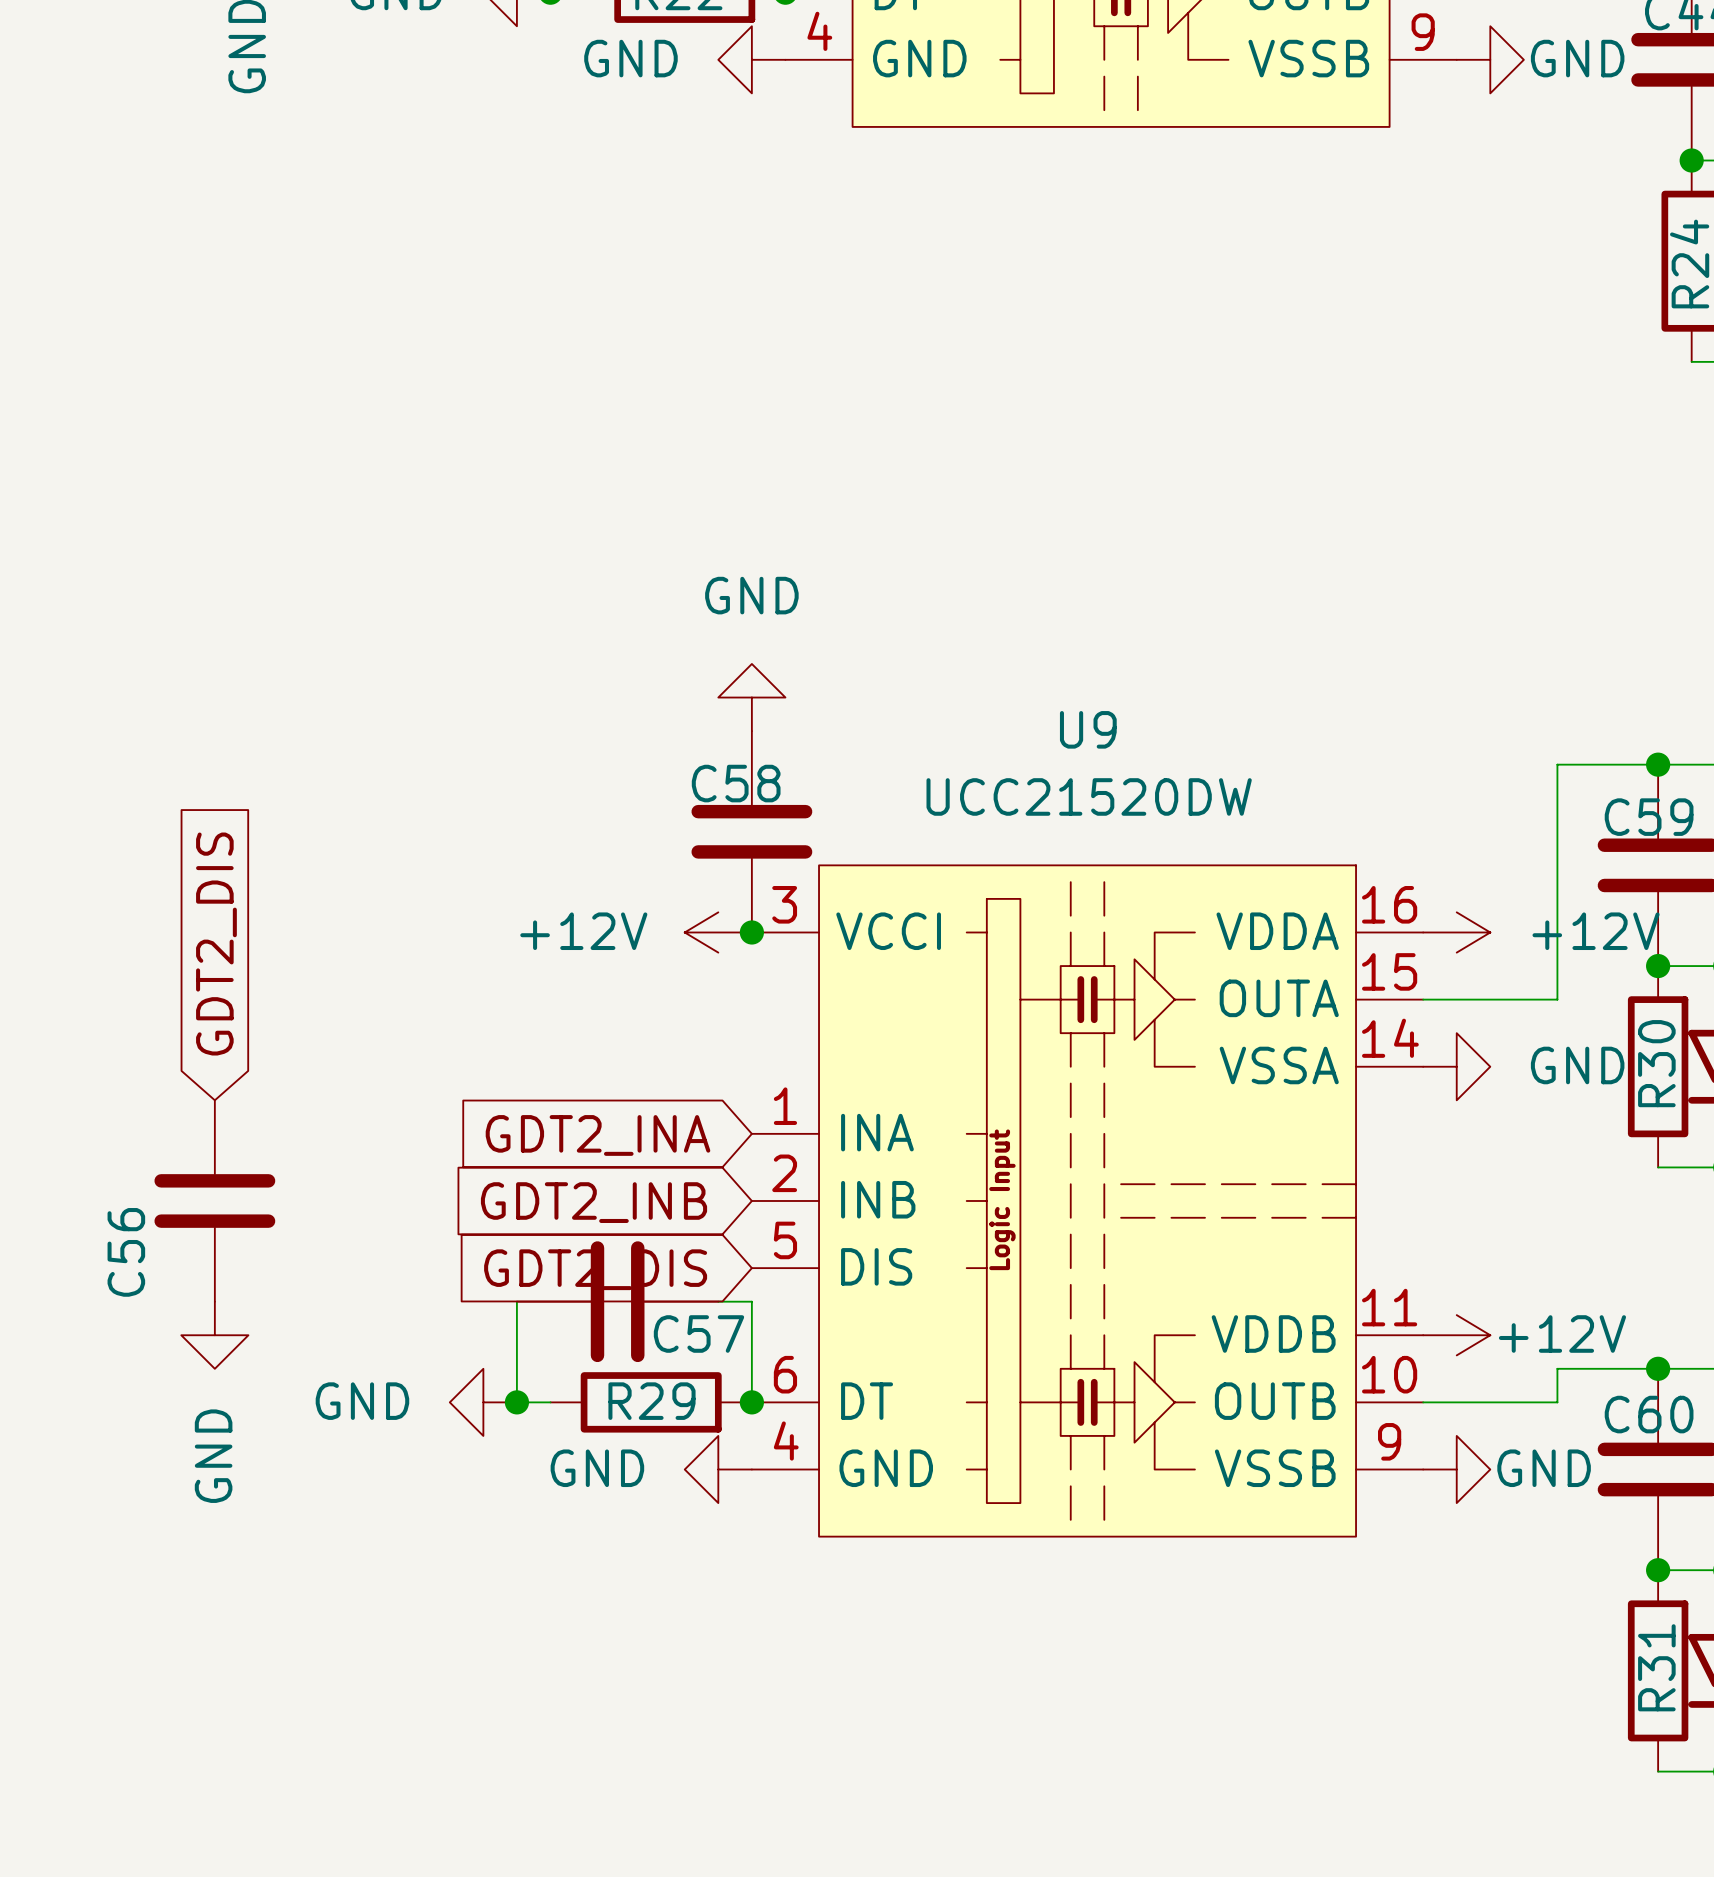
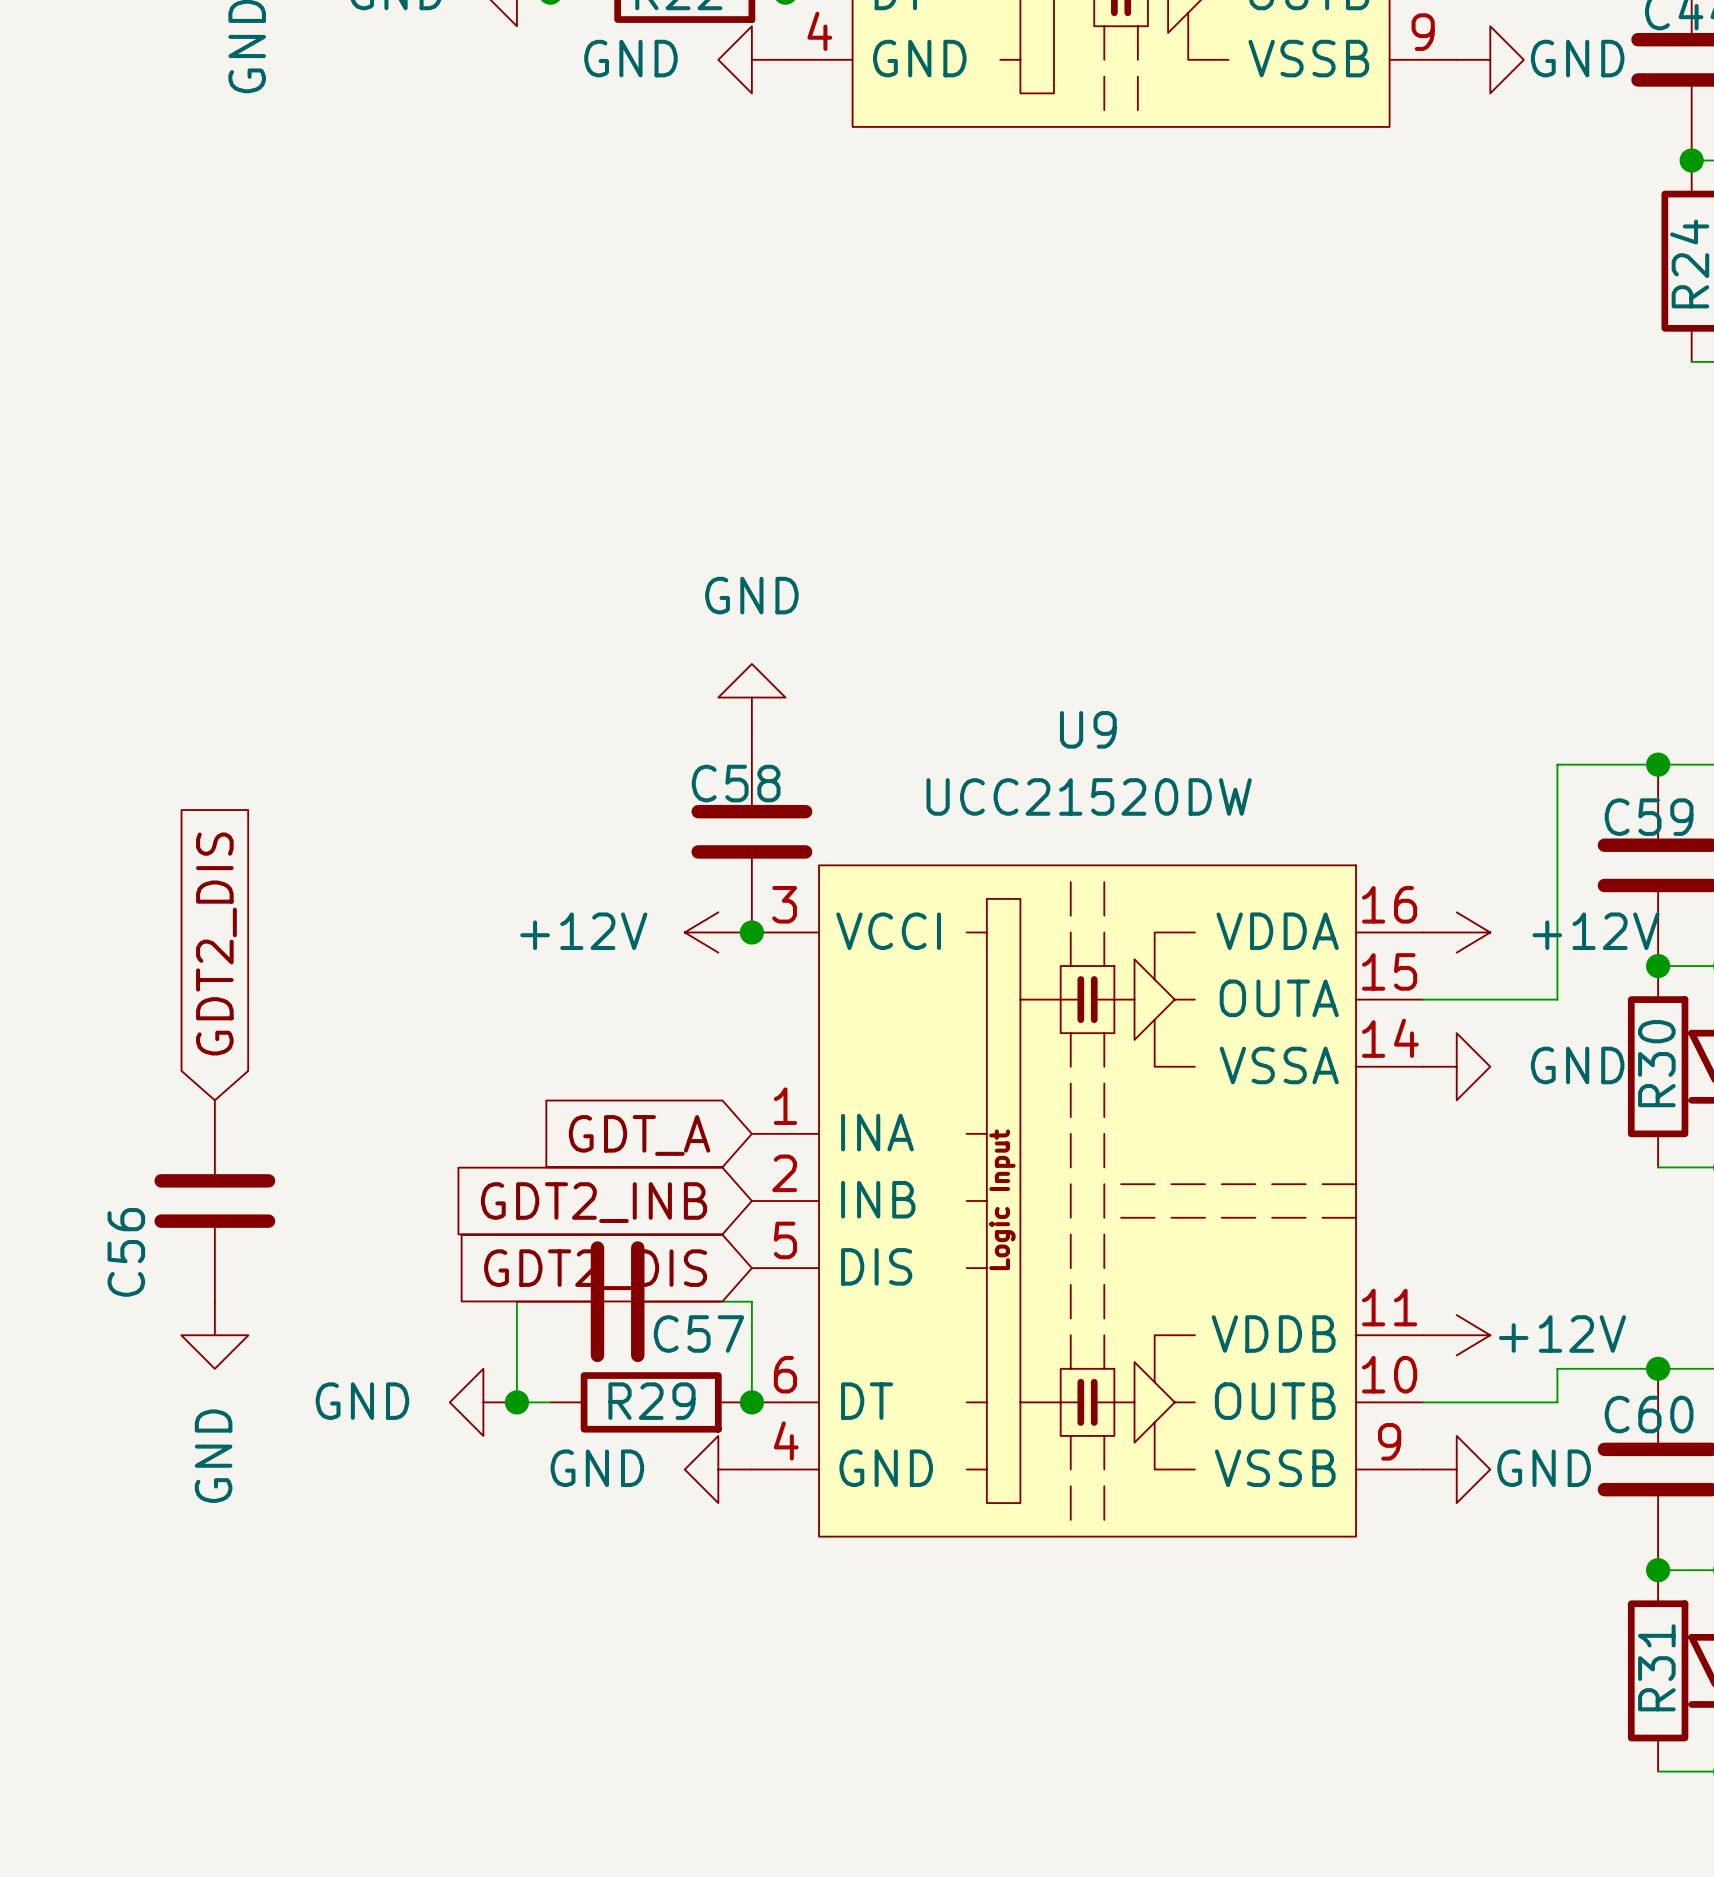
global label: GDT2_INA (598, 1135) -> GDT_A (639, 1135)

